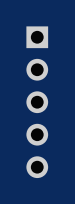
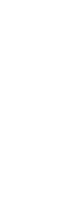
part: (37, 102) -> none

